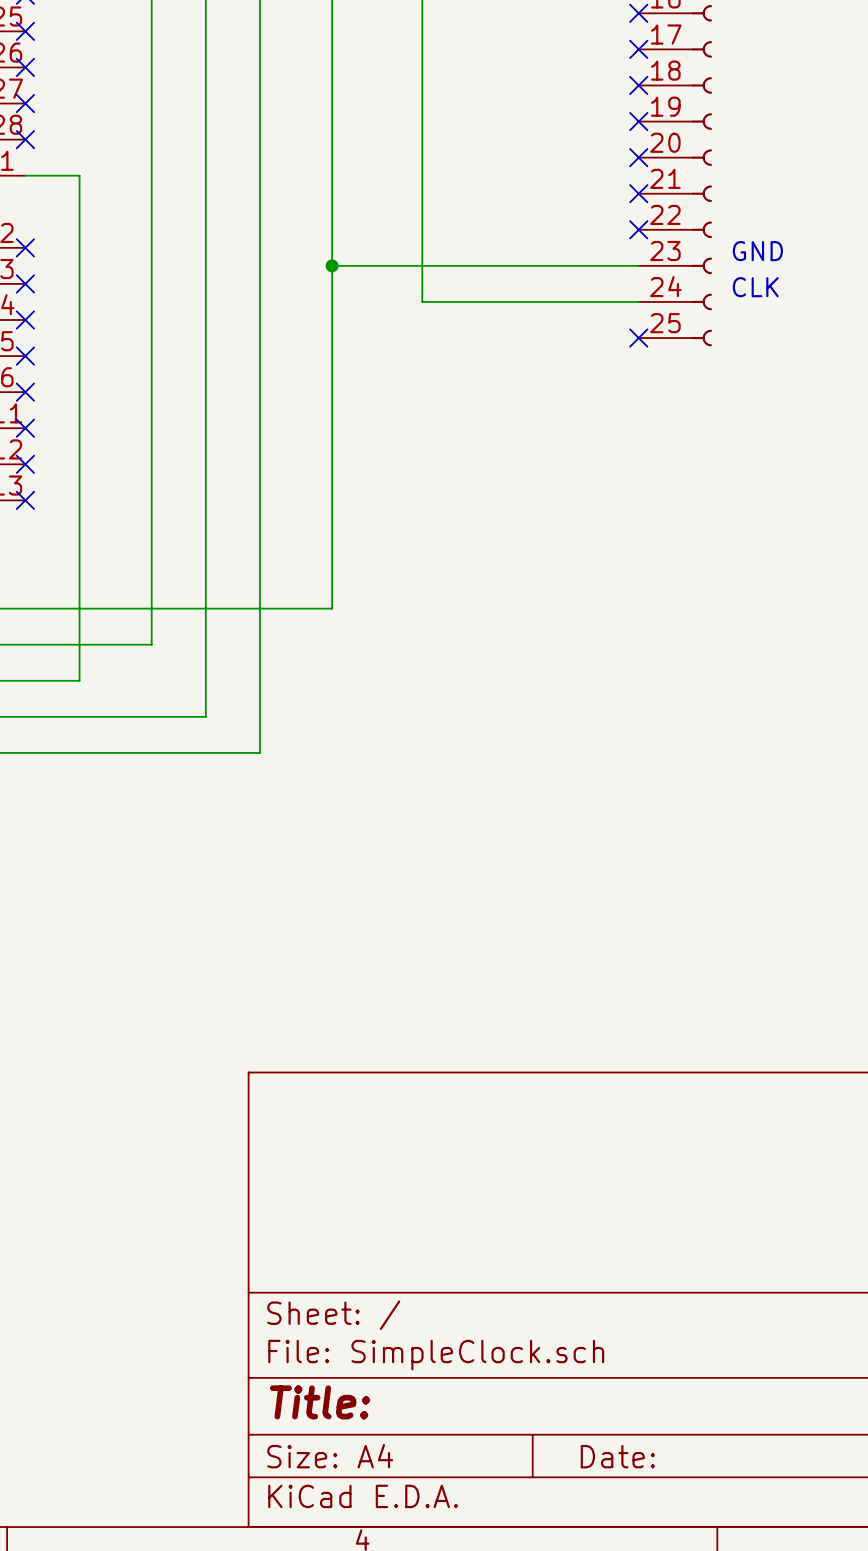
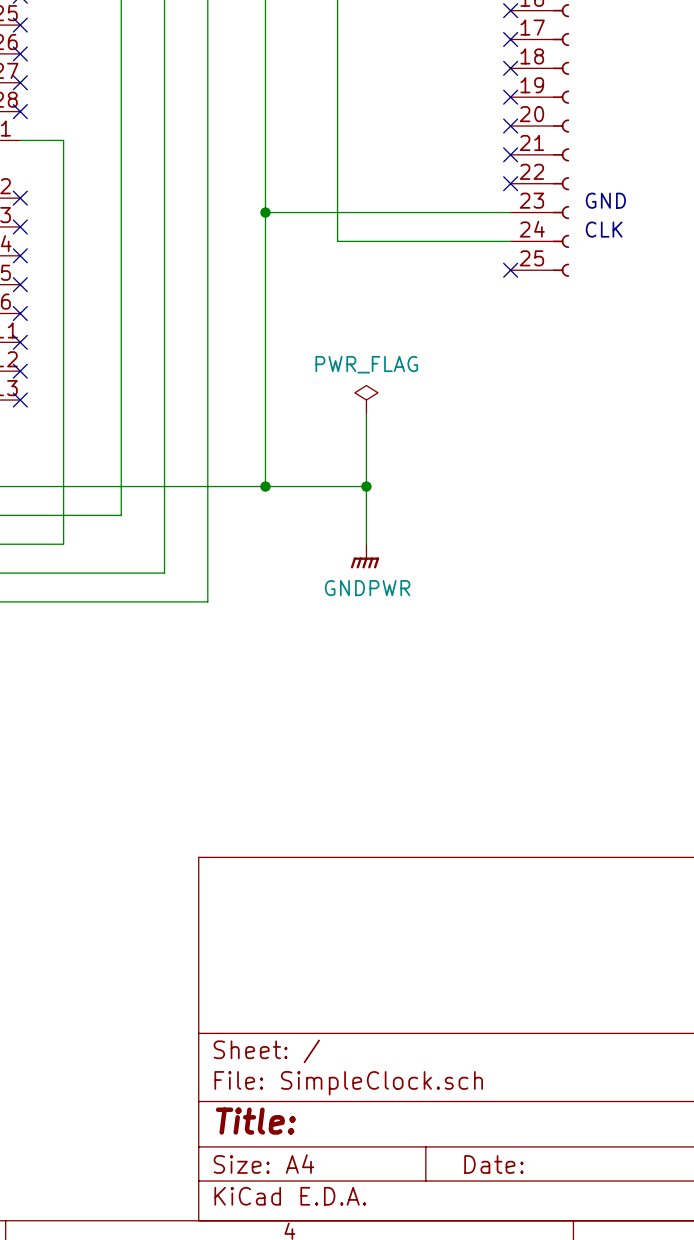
power symbol: none -> PWR_FLAG (366, 400)
wire: none -> (366, 414) (366, 544)
wire: none -> (265, 486) (366, 486)
junction: none -> (265, 486)
junction: none -> (366, 486)
power symbol: none -> GNDPWR (364, 556)

